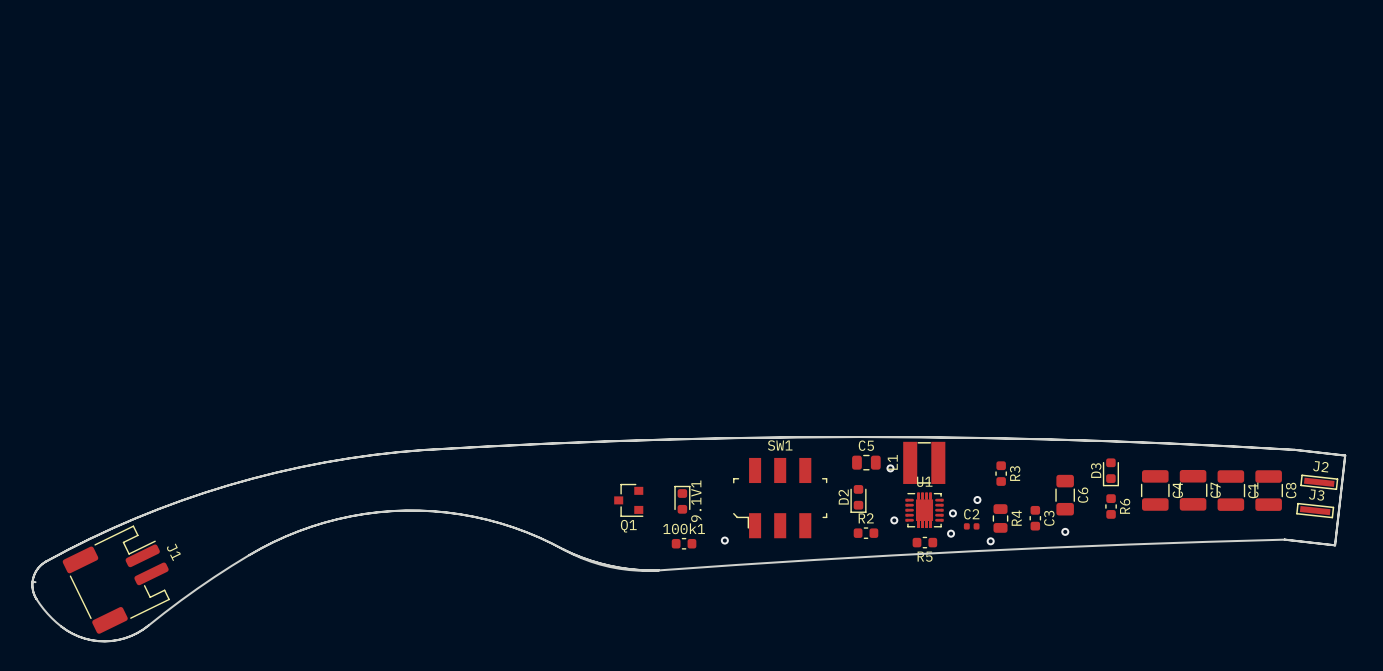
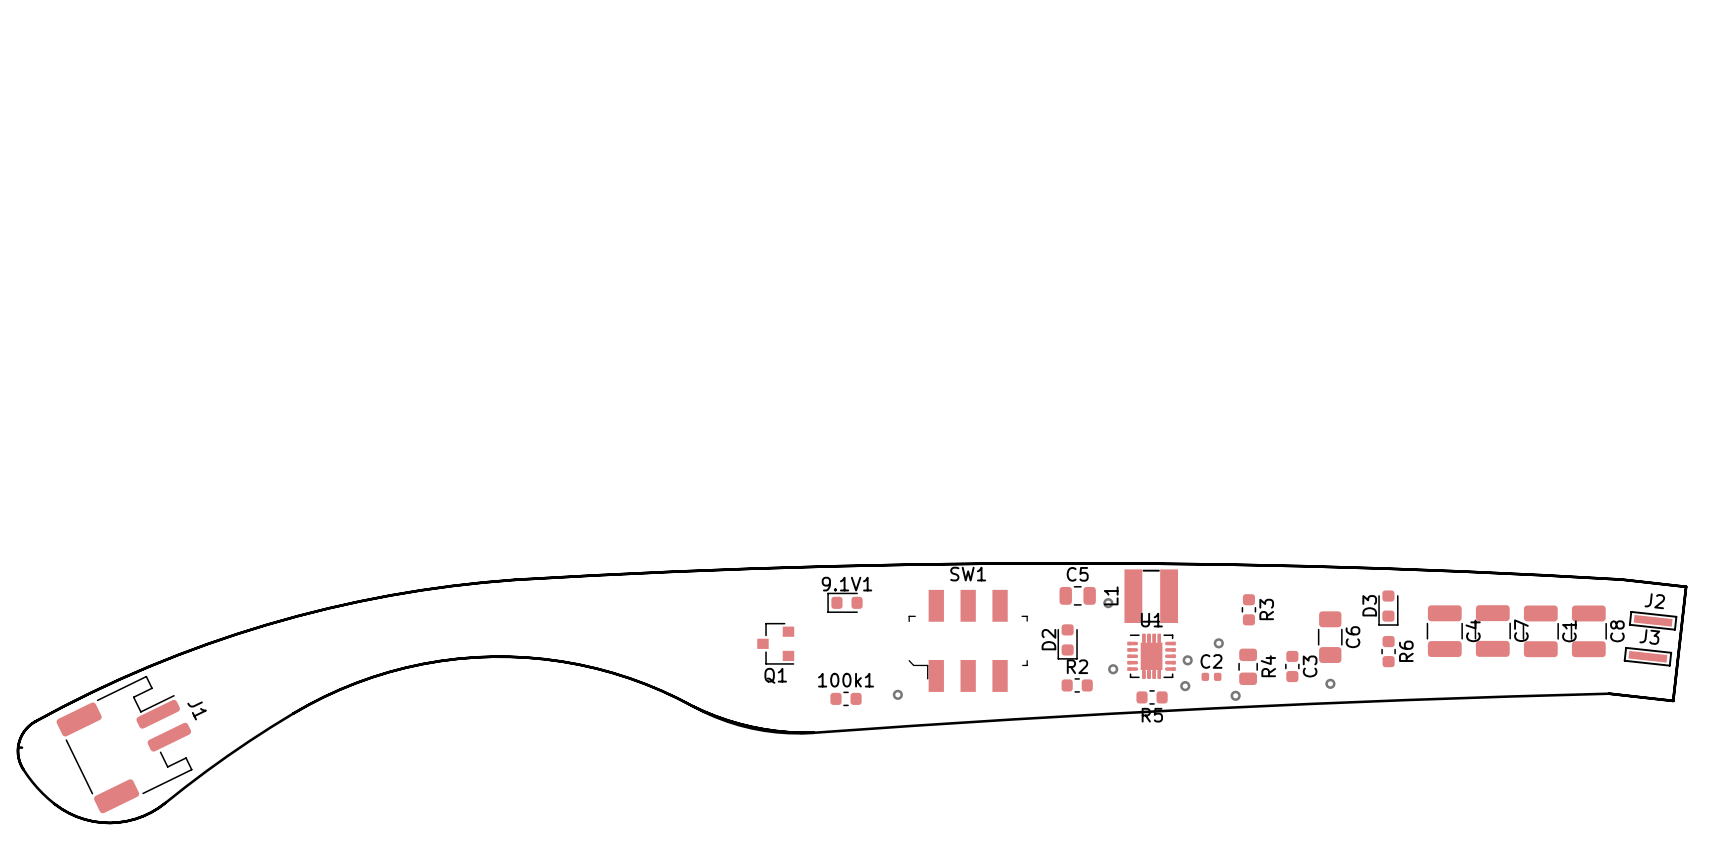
9.1V1 rotation: 0° (682, 499) -> 90° counterclockwise (844, 602)
9.1V1 position: (682, 499) -> (844, 602)

